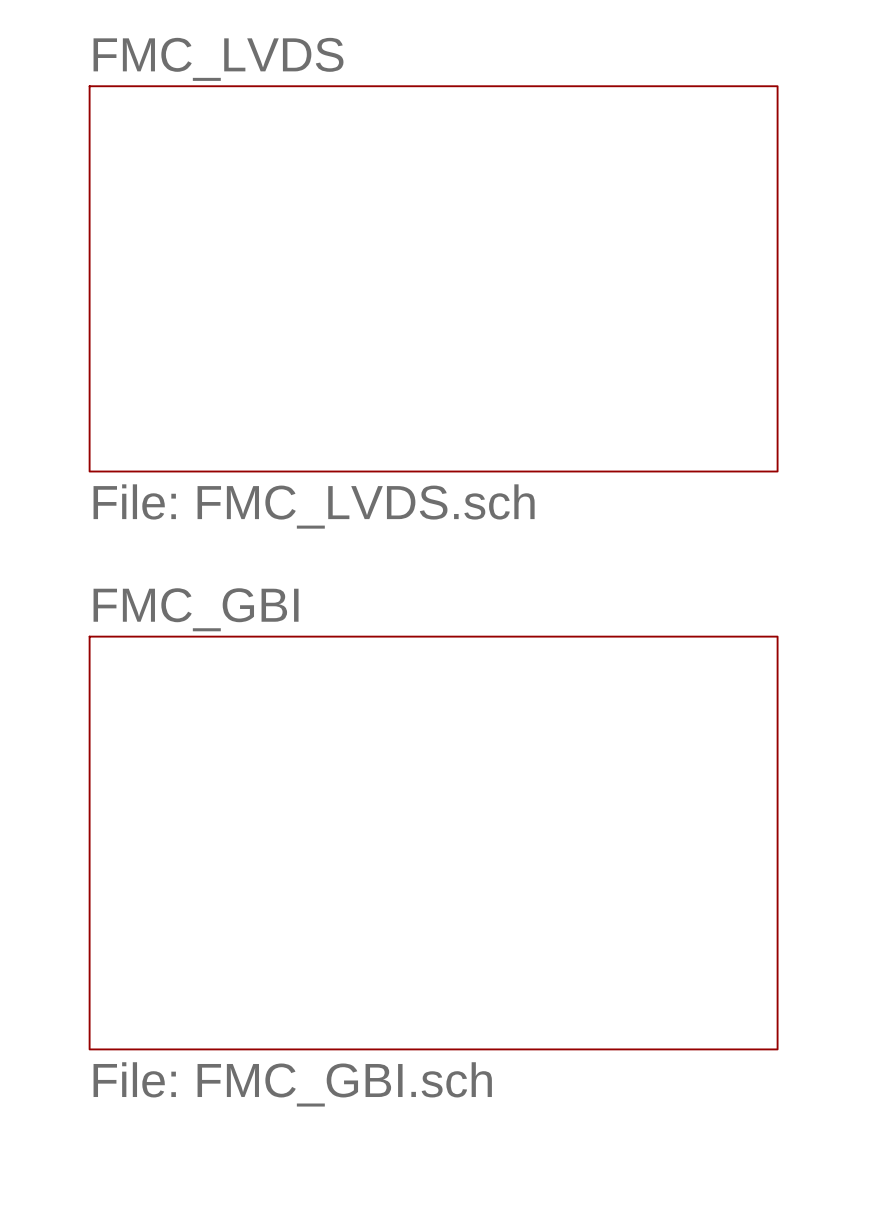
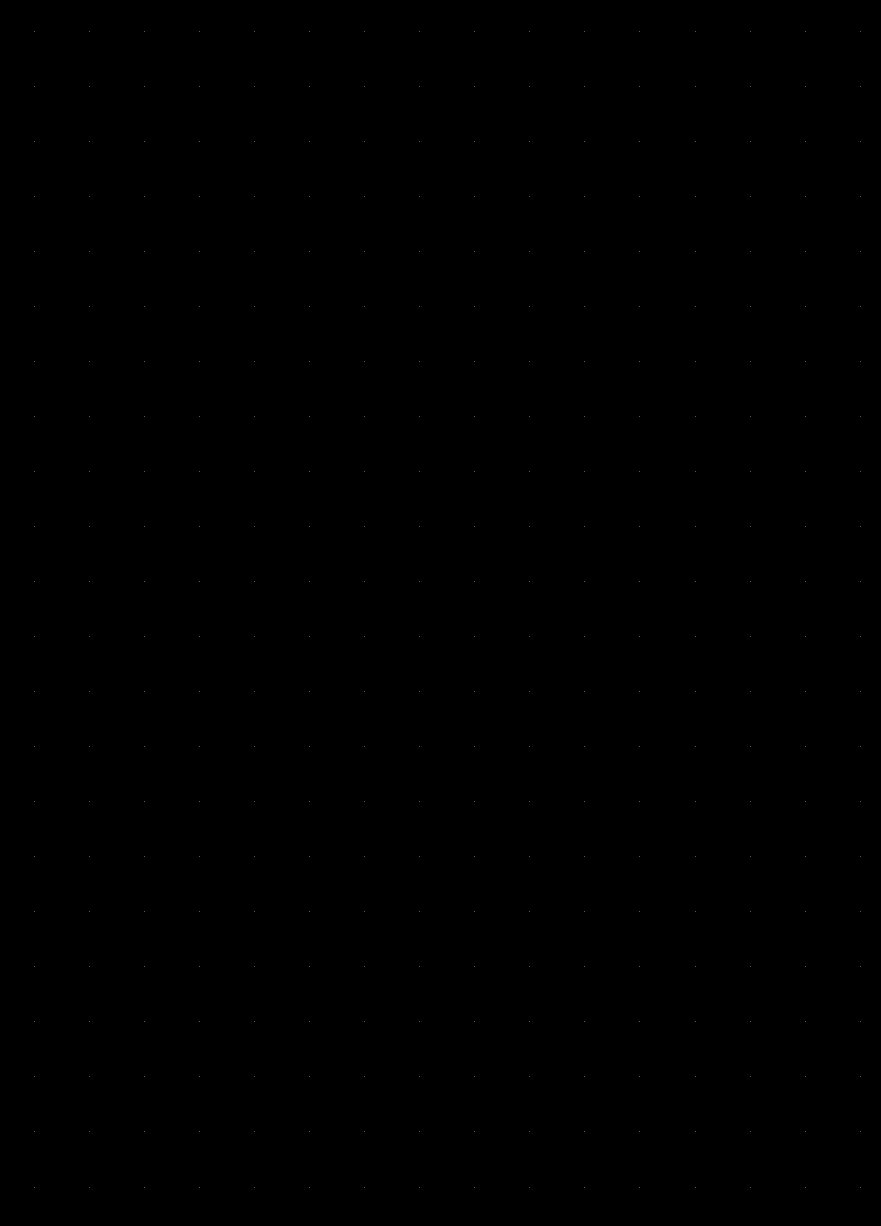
sheet FMC_LVDS: File: FMC_LVDS.sch (433, 278) -> none
sheet FMC_GBI: File: FMC_GBI.sch (433, 843) -> none

